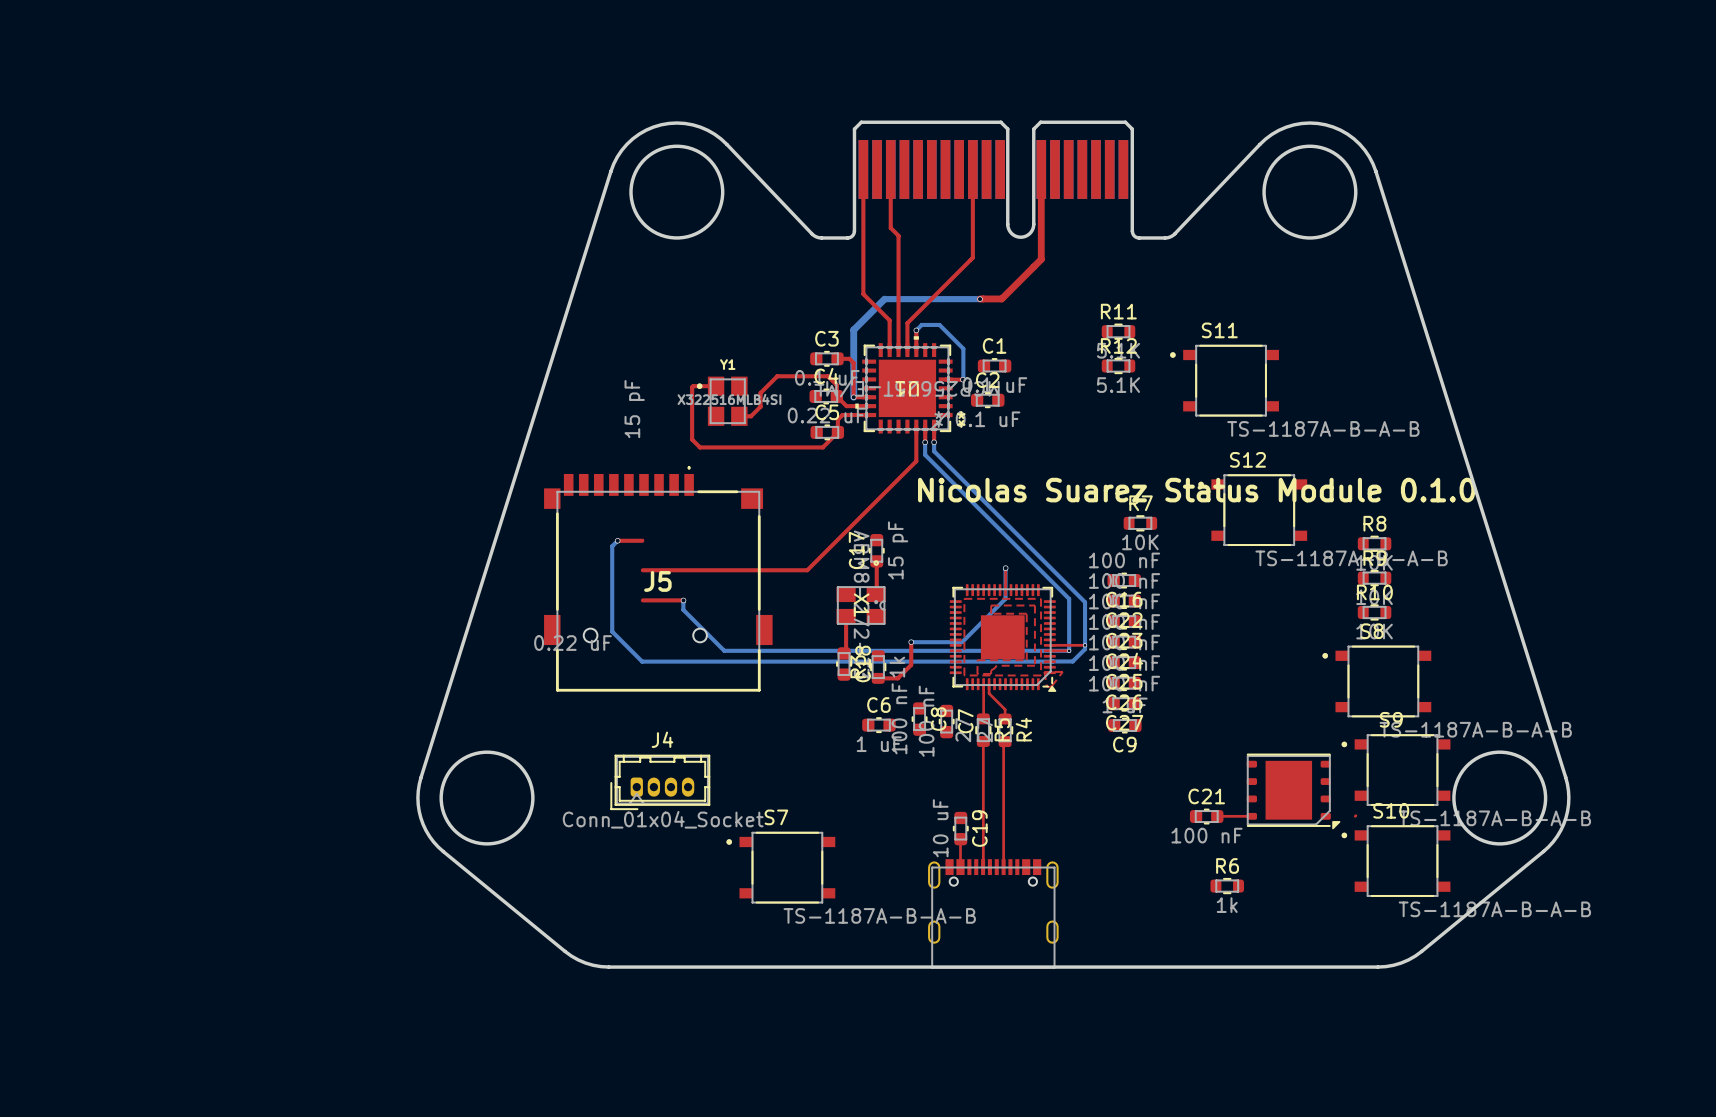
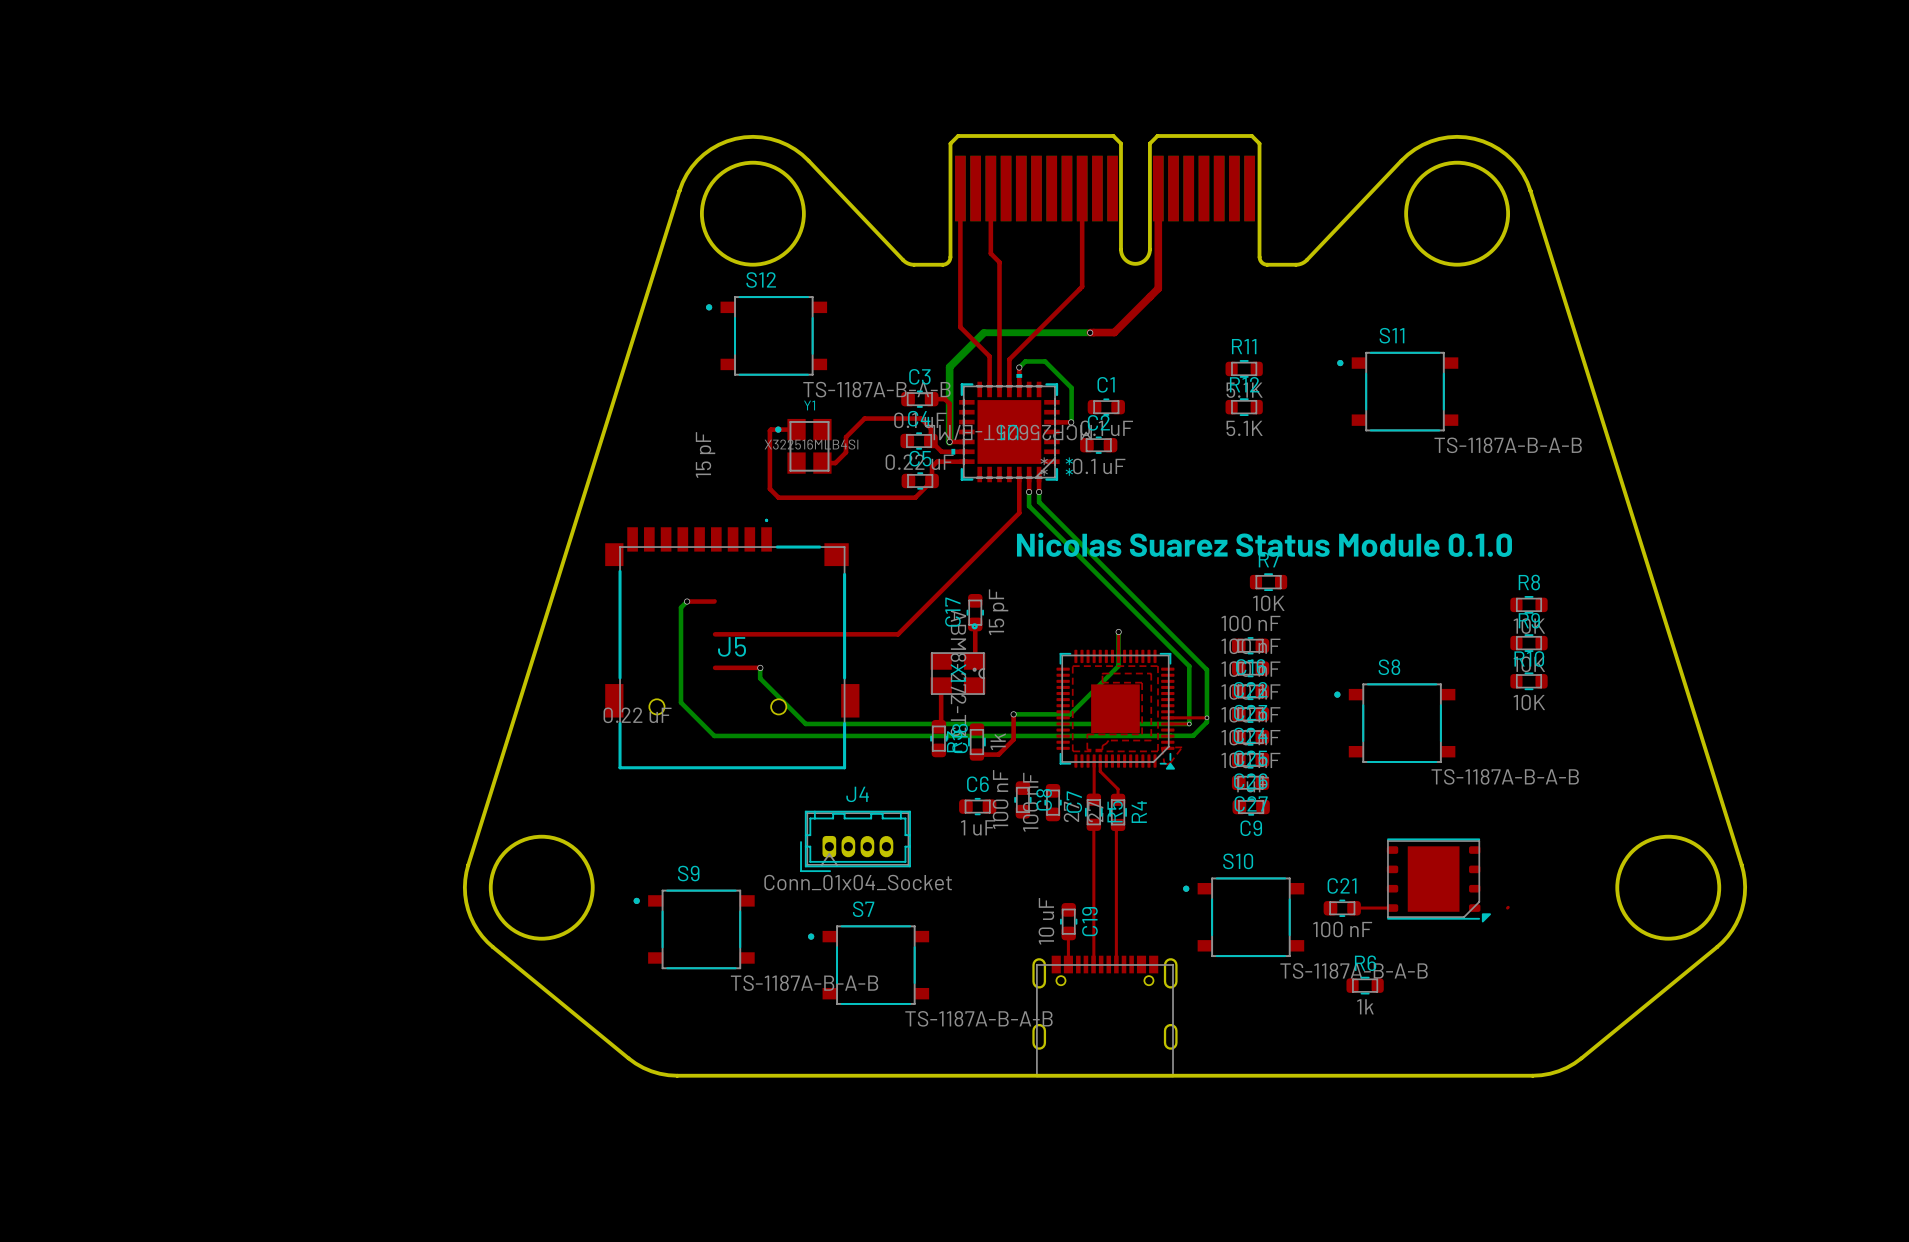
S11 position: (1224, 380) -> (1397, 391)
S12 position: (1252, 510) -> (766, 335)
S8 position: (1376, 681) -> (1394, 723)
S9 position: (1396, 770) -> (694, 929)
J4 position: (660, 782) -> (855, 841)
S10 position: (1396, 861) -> (1243, 917)

